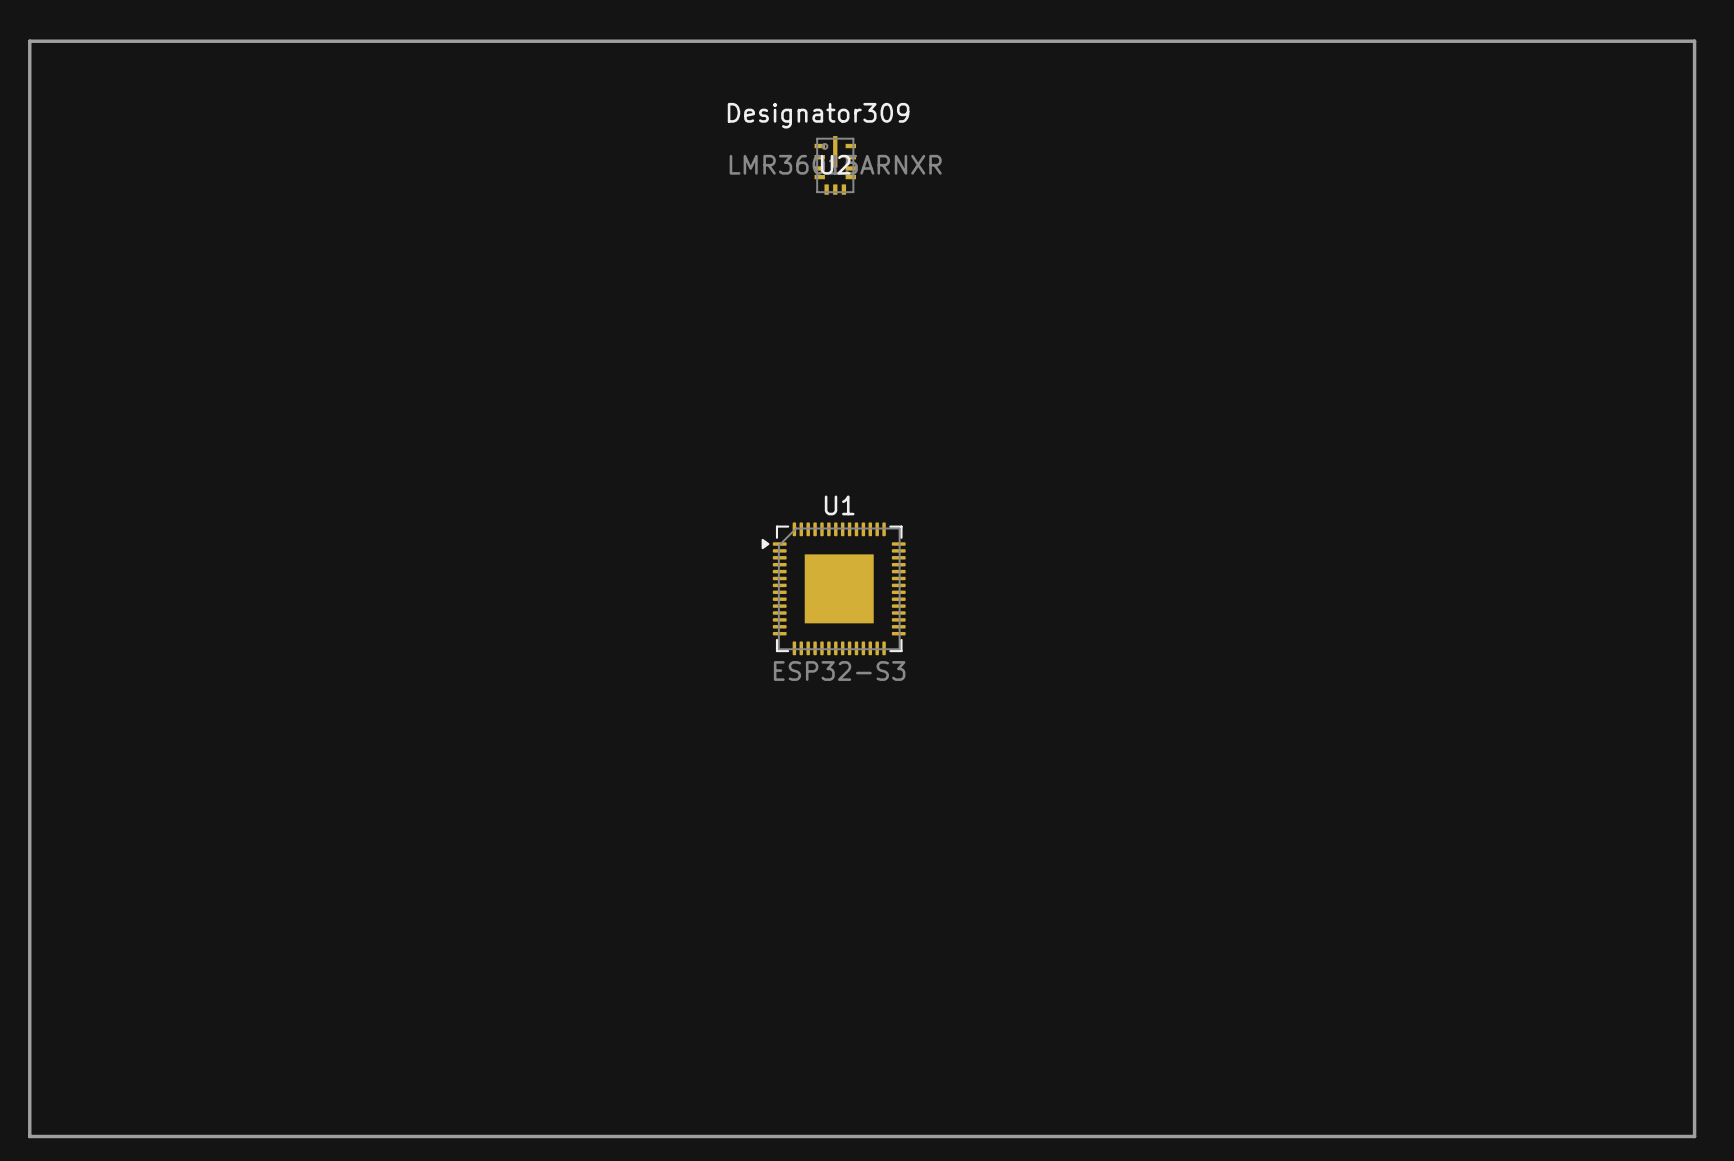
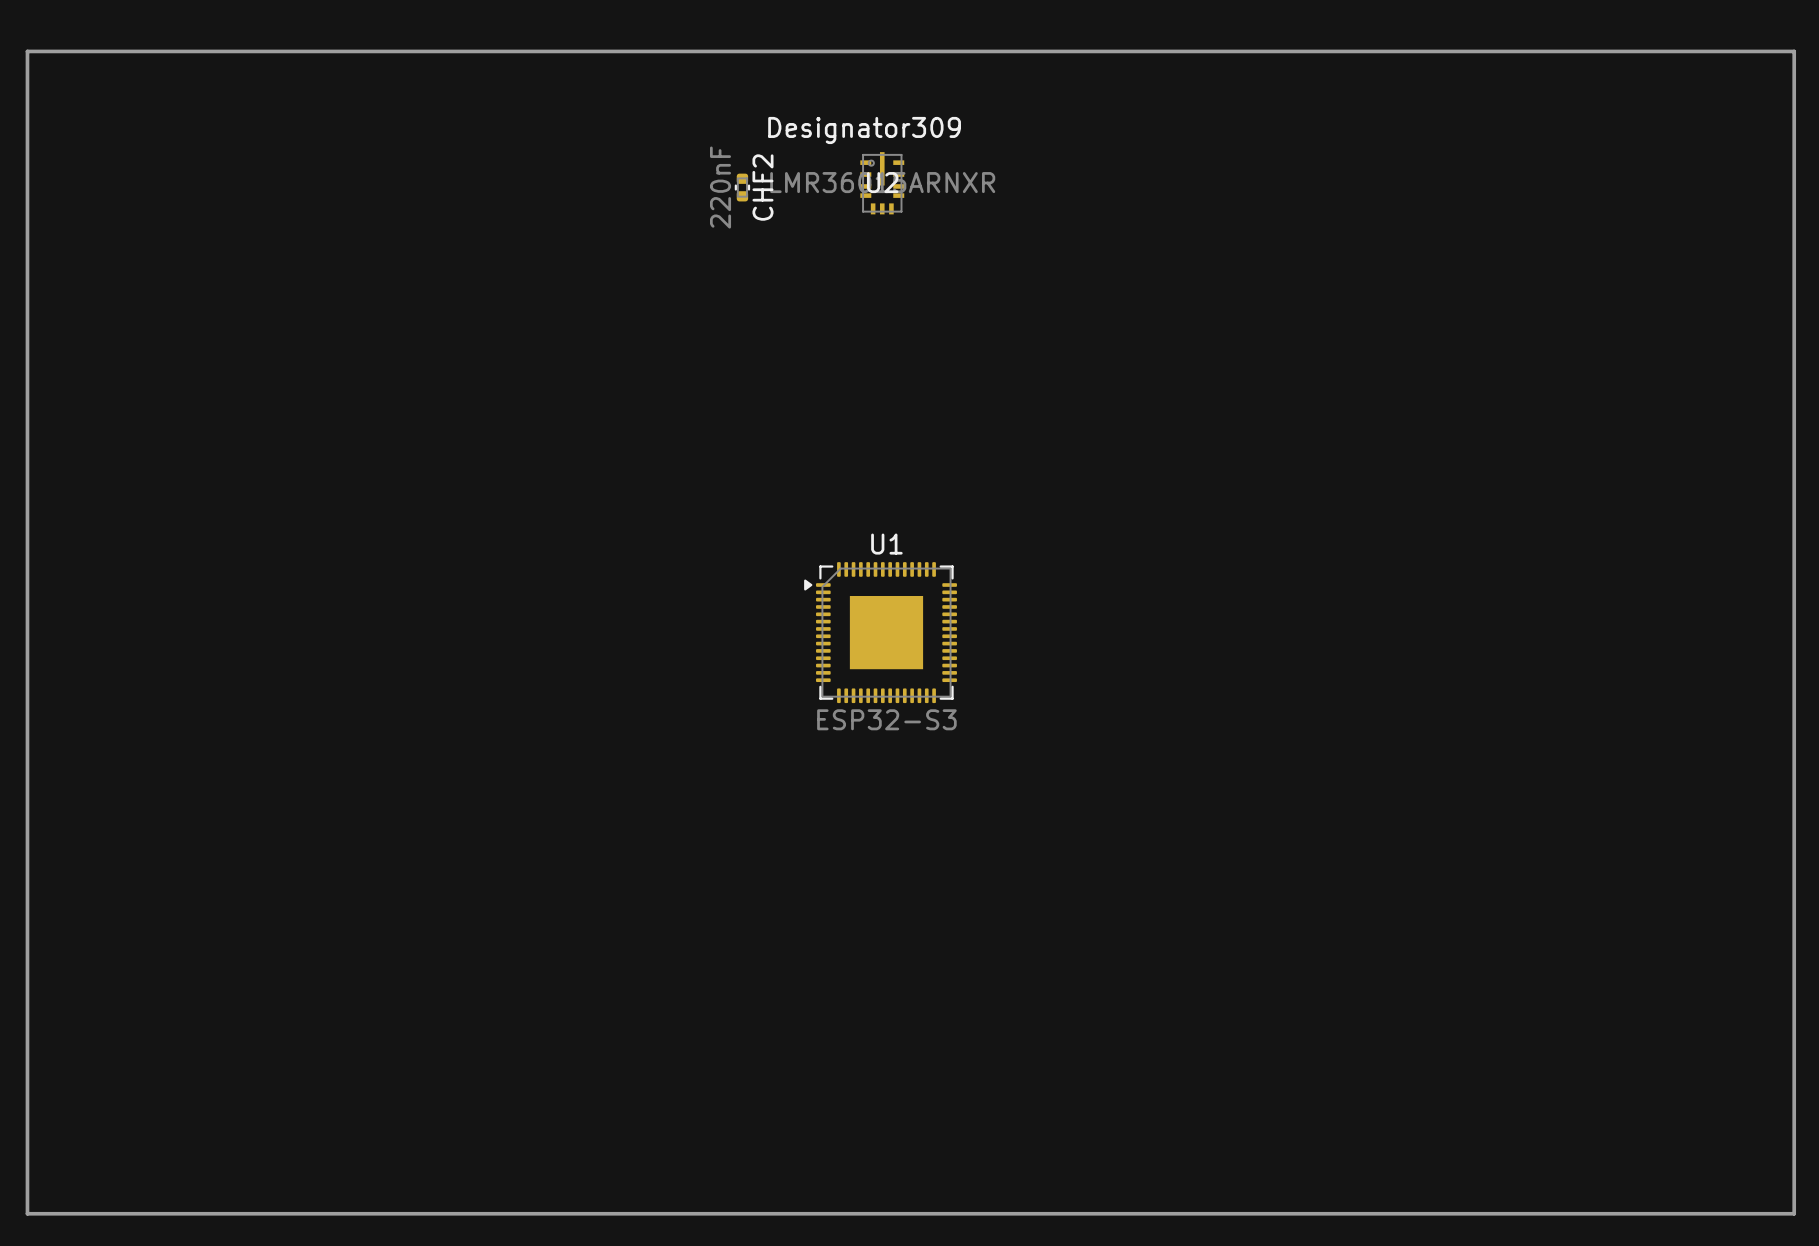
CHF2: none -> 220nF (742, 187)

